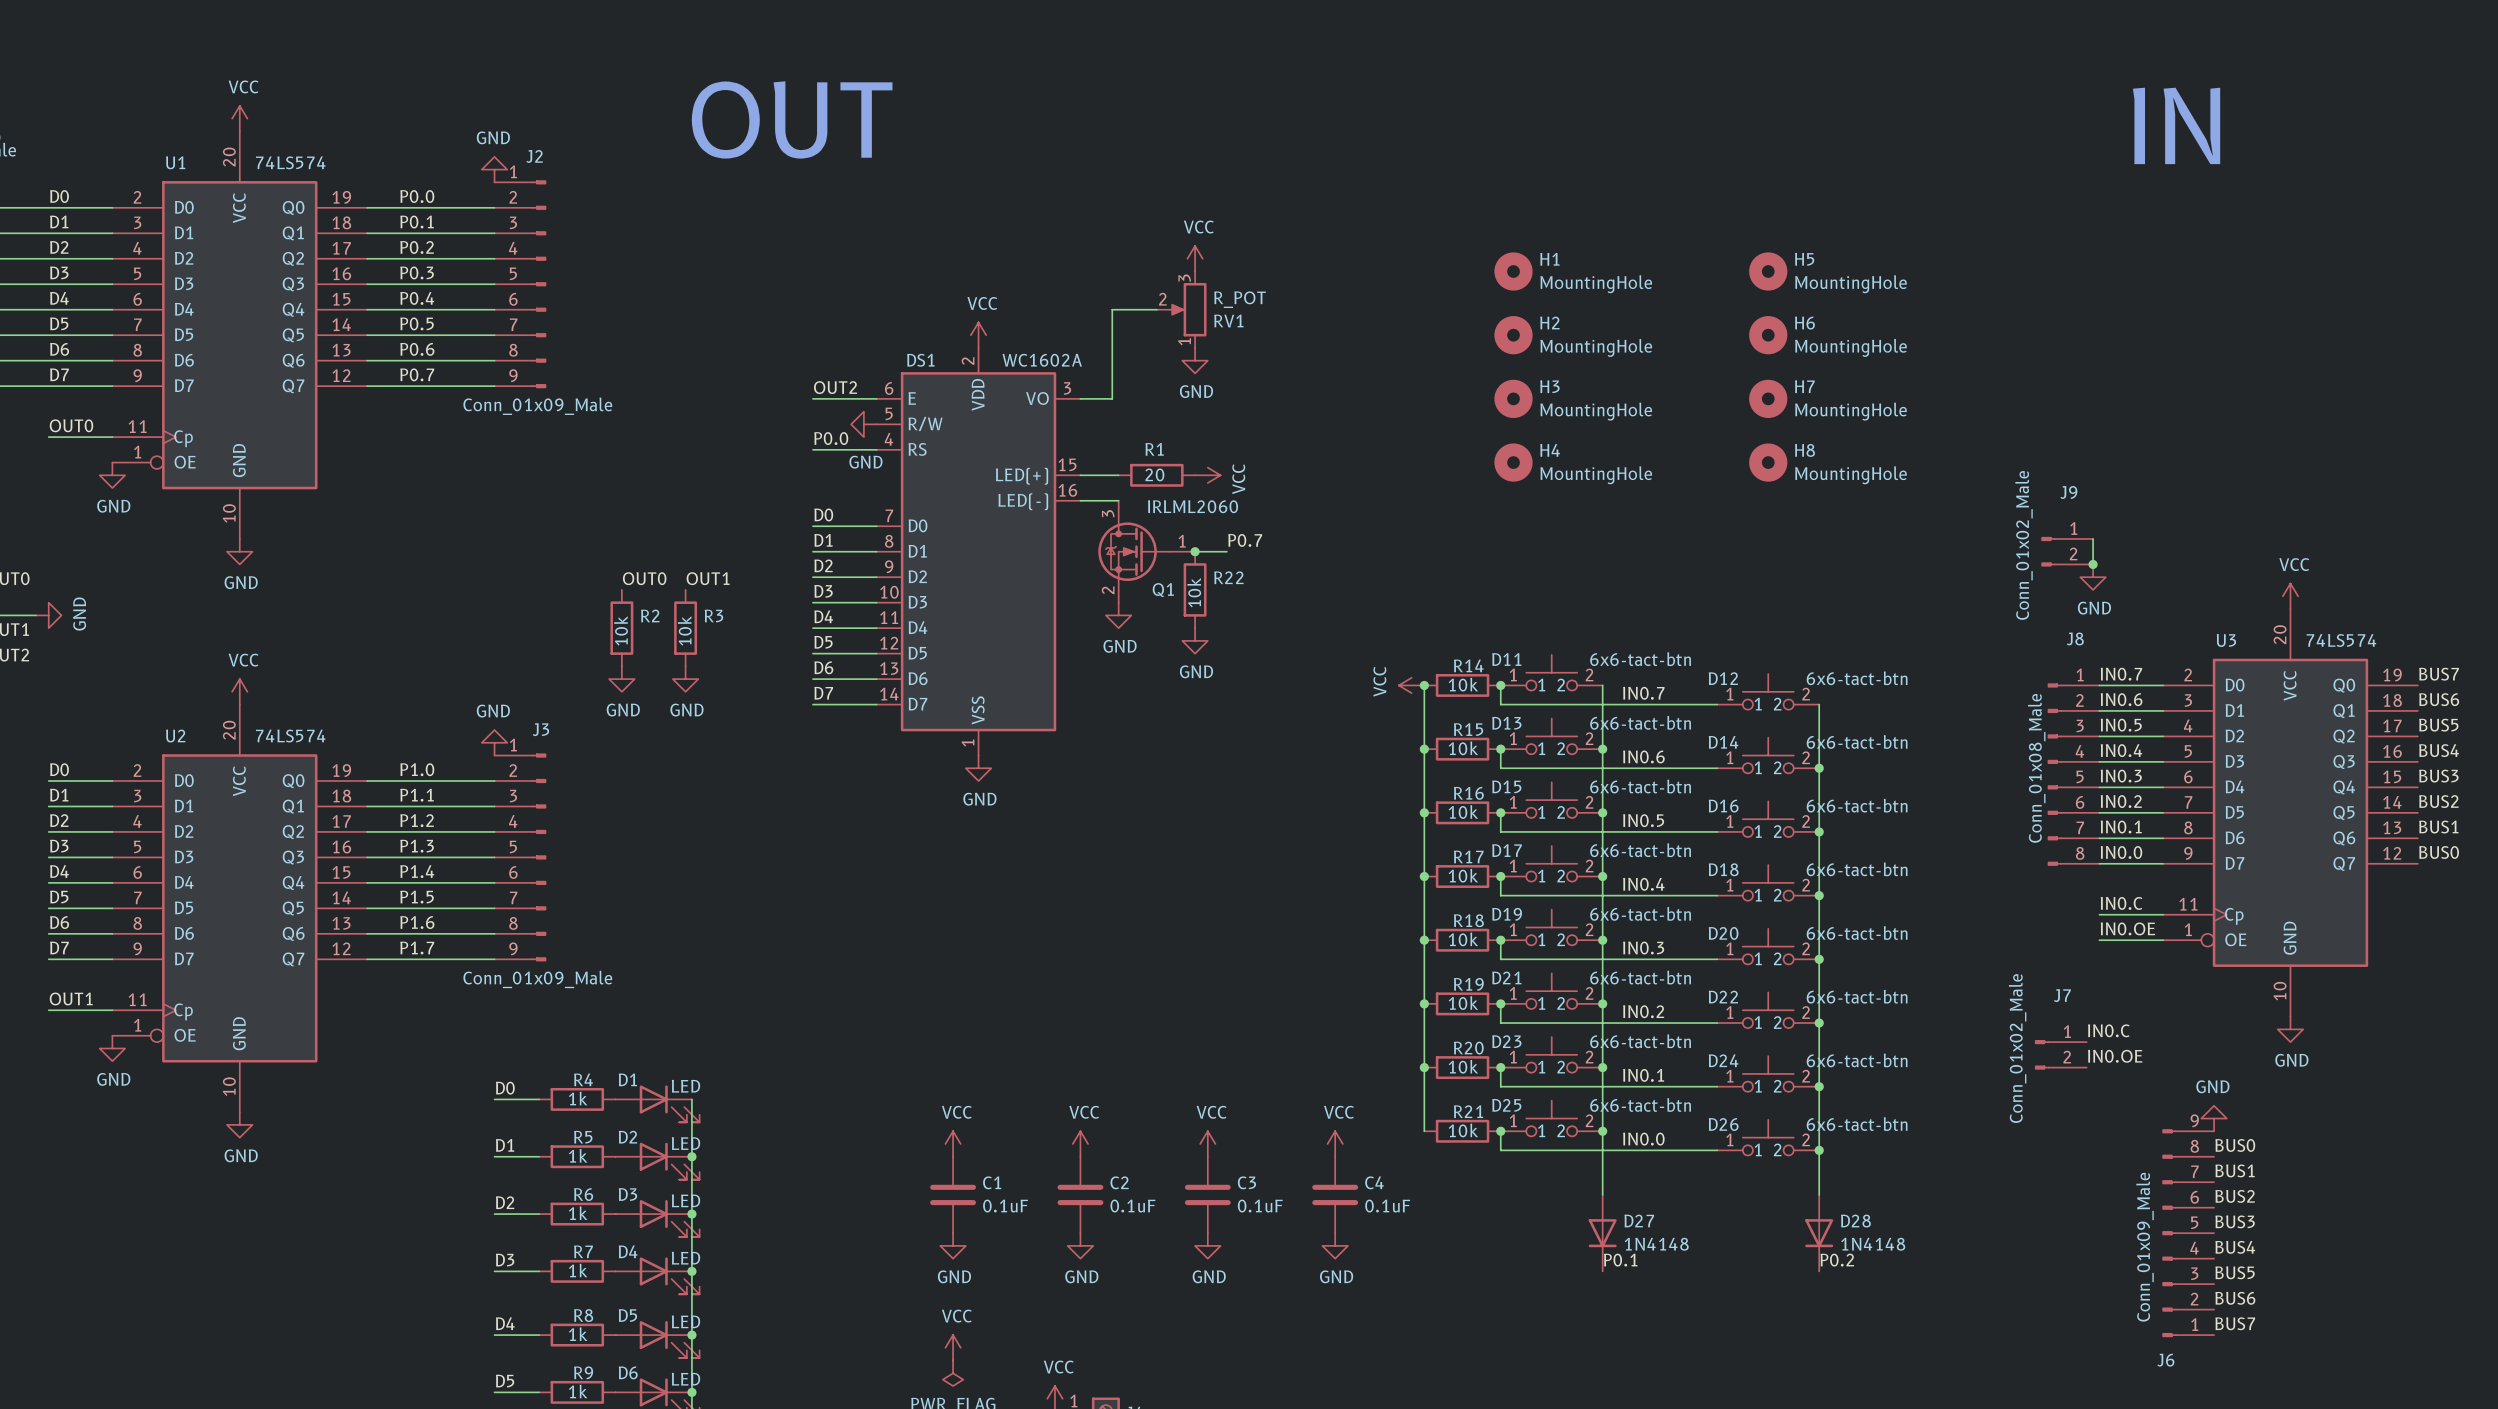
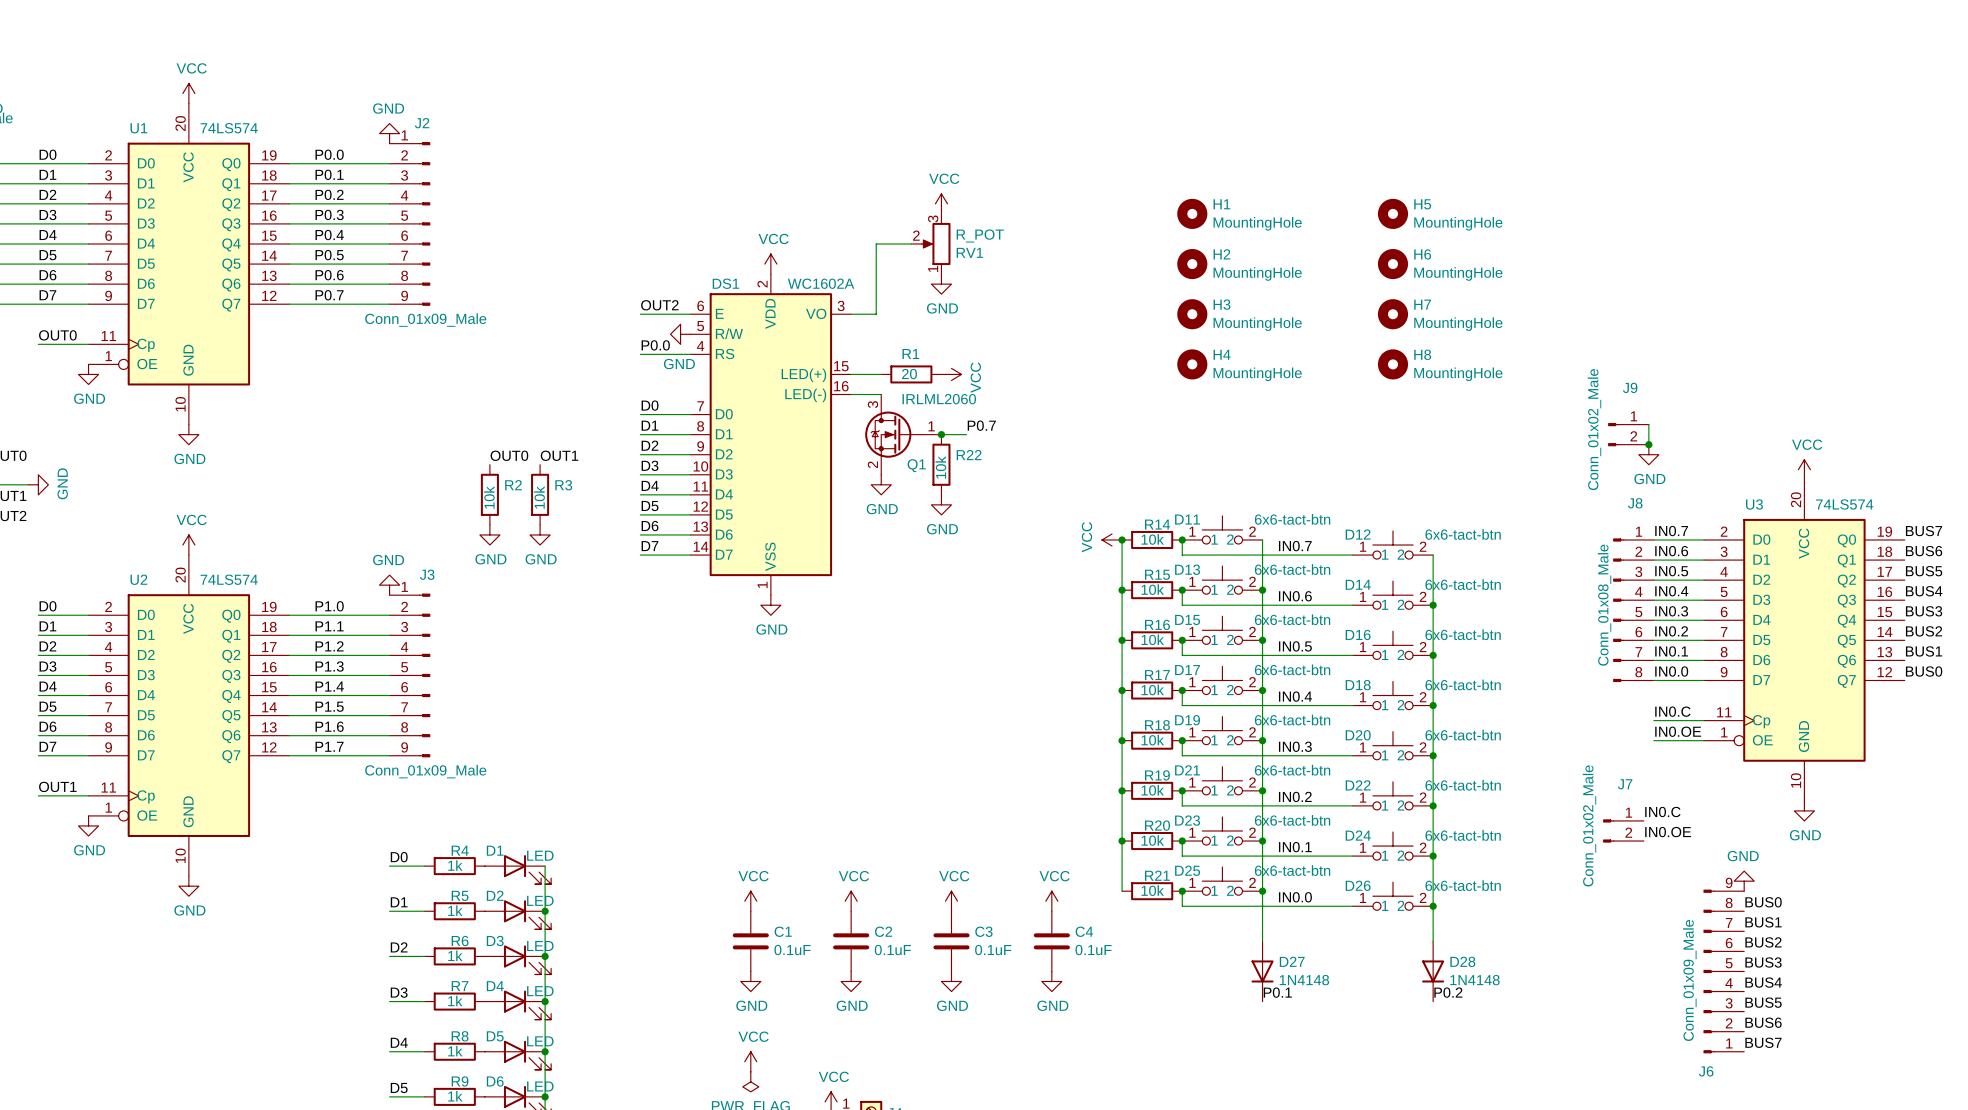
text: OUT (792, 119) -> none
text: IN (2176, 125) -> none

